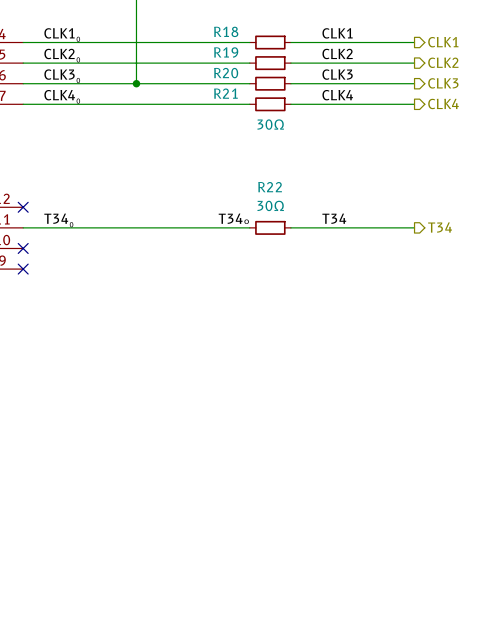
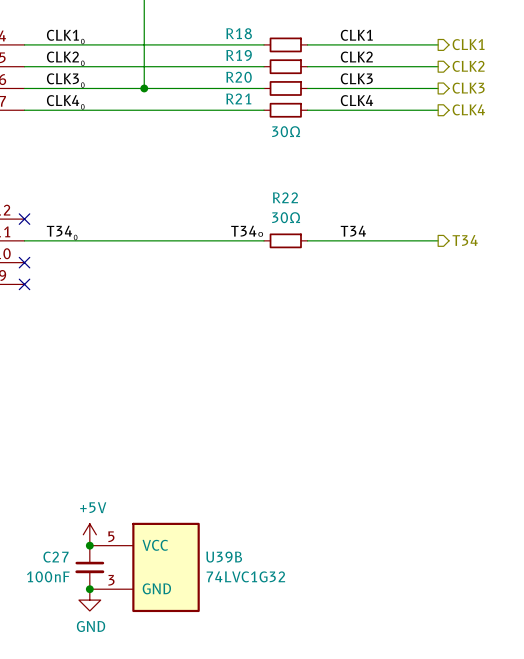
power symbol: none -> +5V (89, 534)
junction: none -> (89, 545)
C27: none -> 100nF (89, 567)
U39B: none -> 74LVC1G32 (144, 567)
junction: none -> (89, 589)
power symbol: none -> GND (89, 600)

